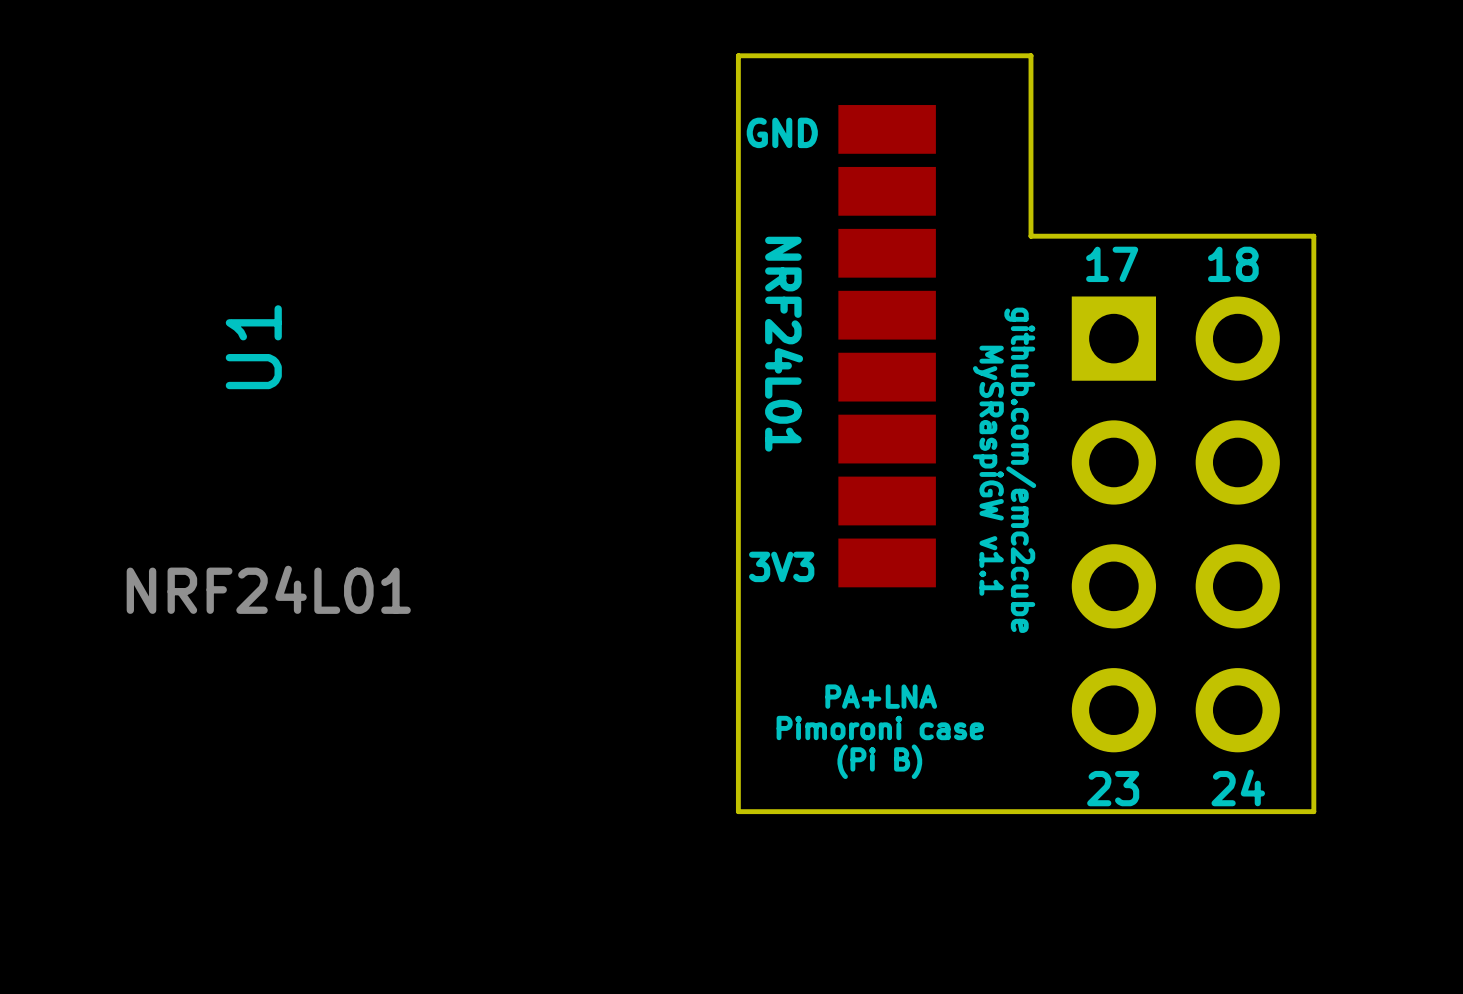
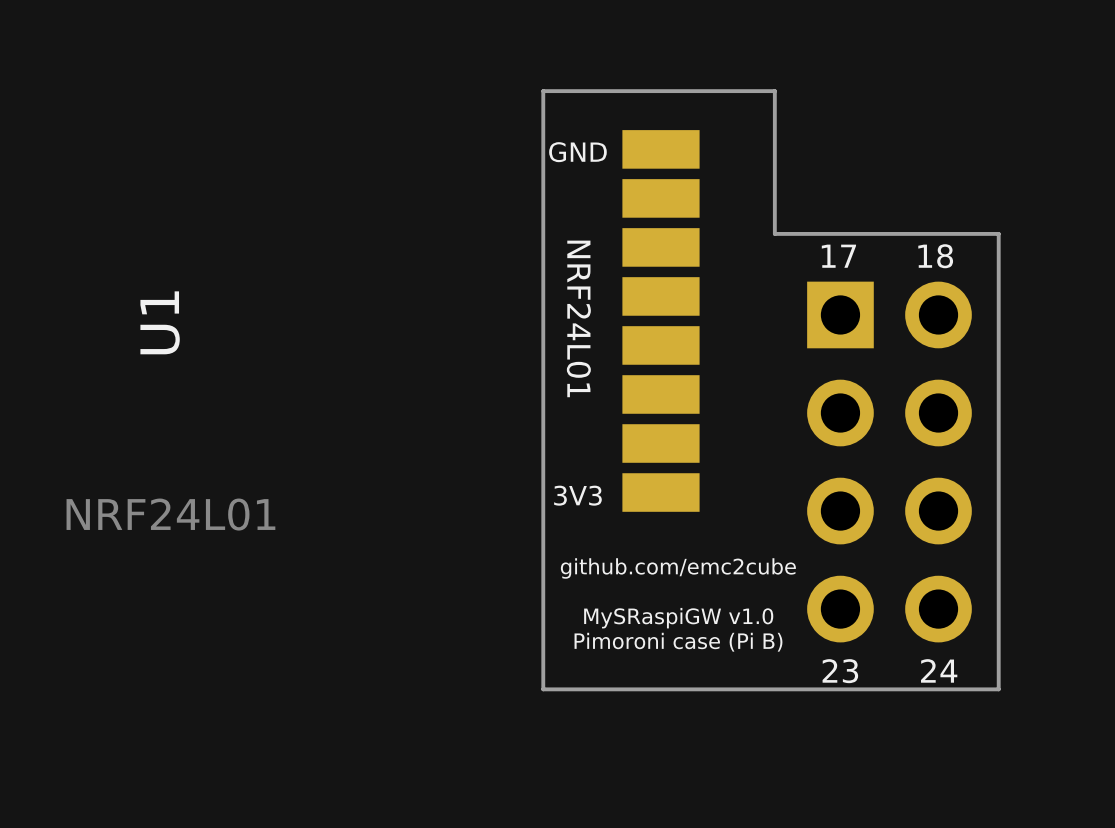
text: MySRaspiGW v1.1 (988, 470) -> none
text rotation: 0° (1020, 470) -> 90° counterclockwise (678, 568)
text: PA+LNA (881, 696) -> none
text: none -> MySRaspiGW v1.0 (678, 618)
text: Pimoroni case (880, 728) -> Pimoroni case (Pi B) (678, 642)
text: (Pi B) (879, 761) -> none

